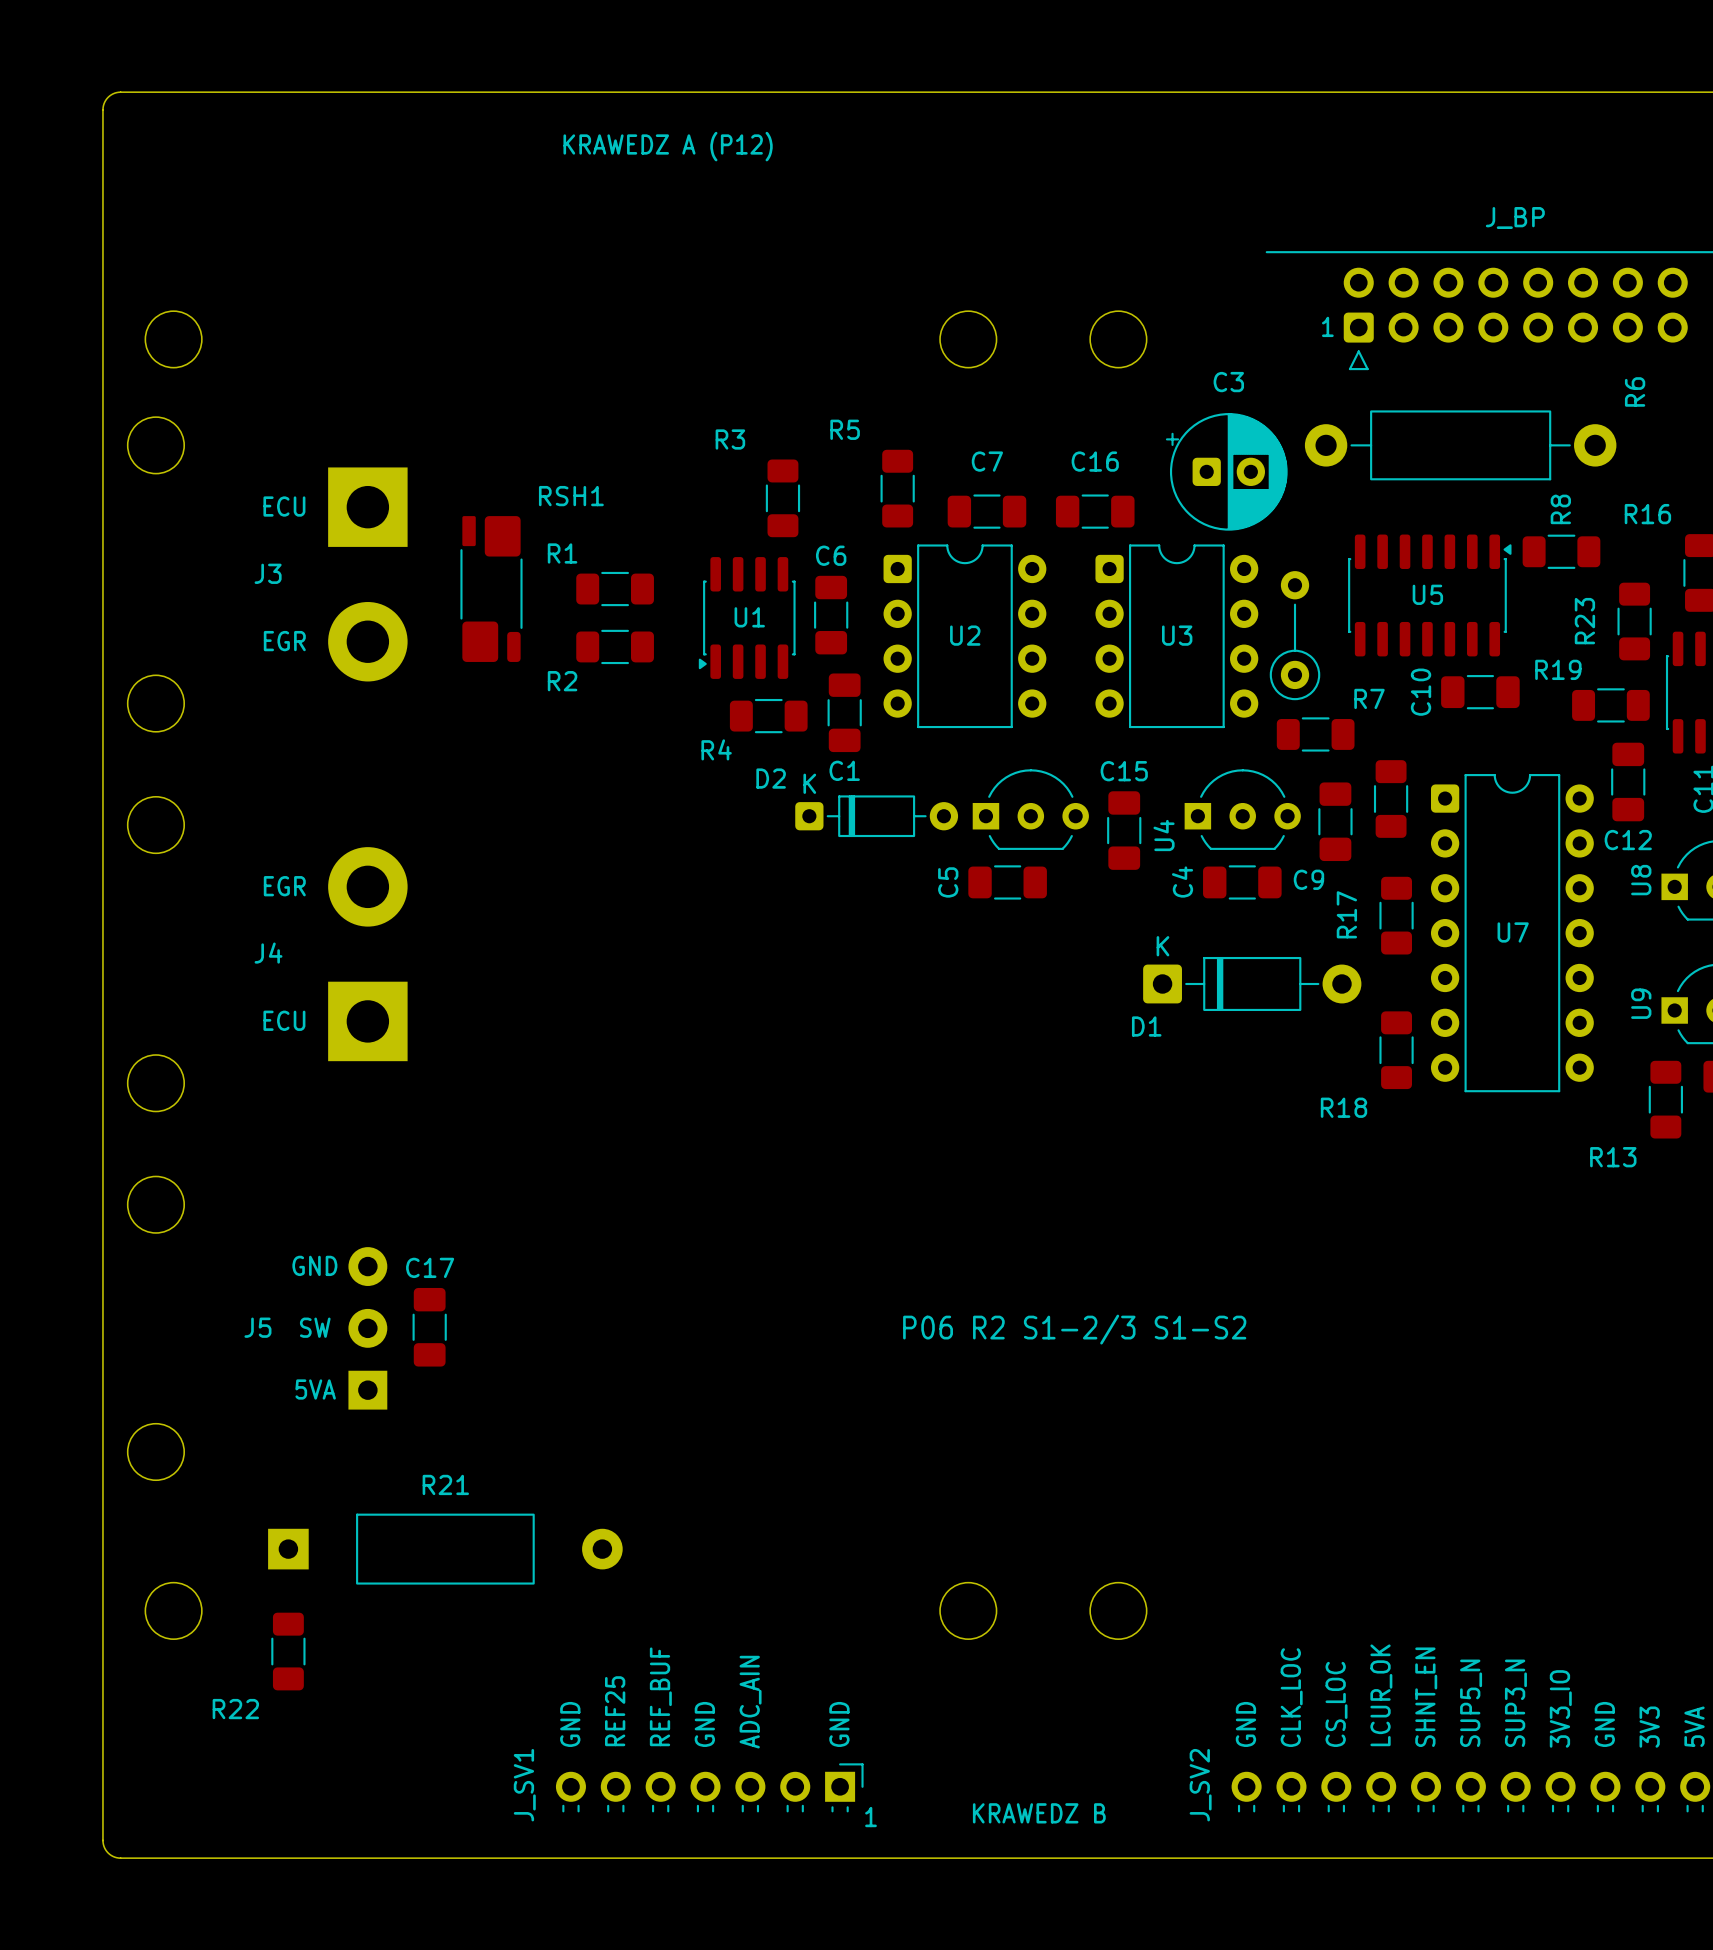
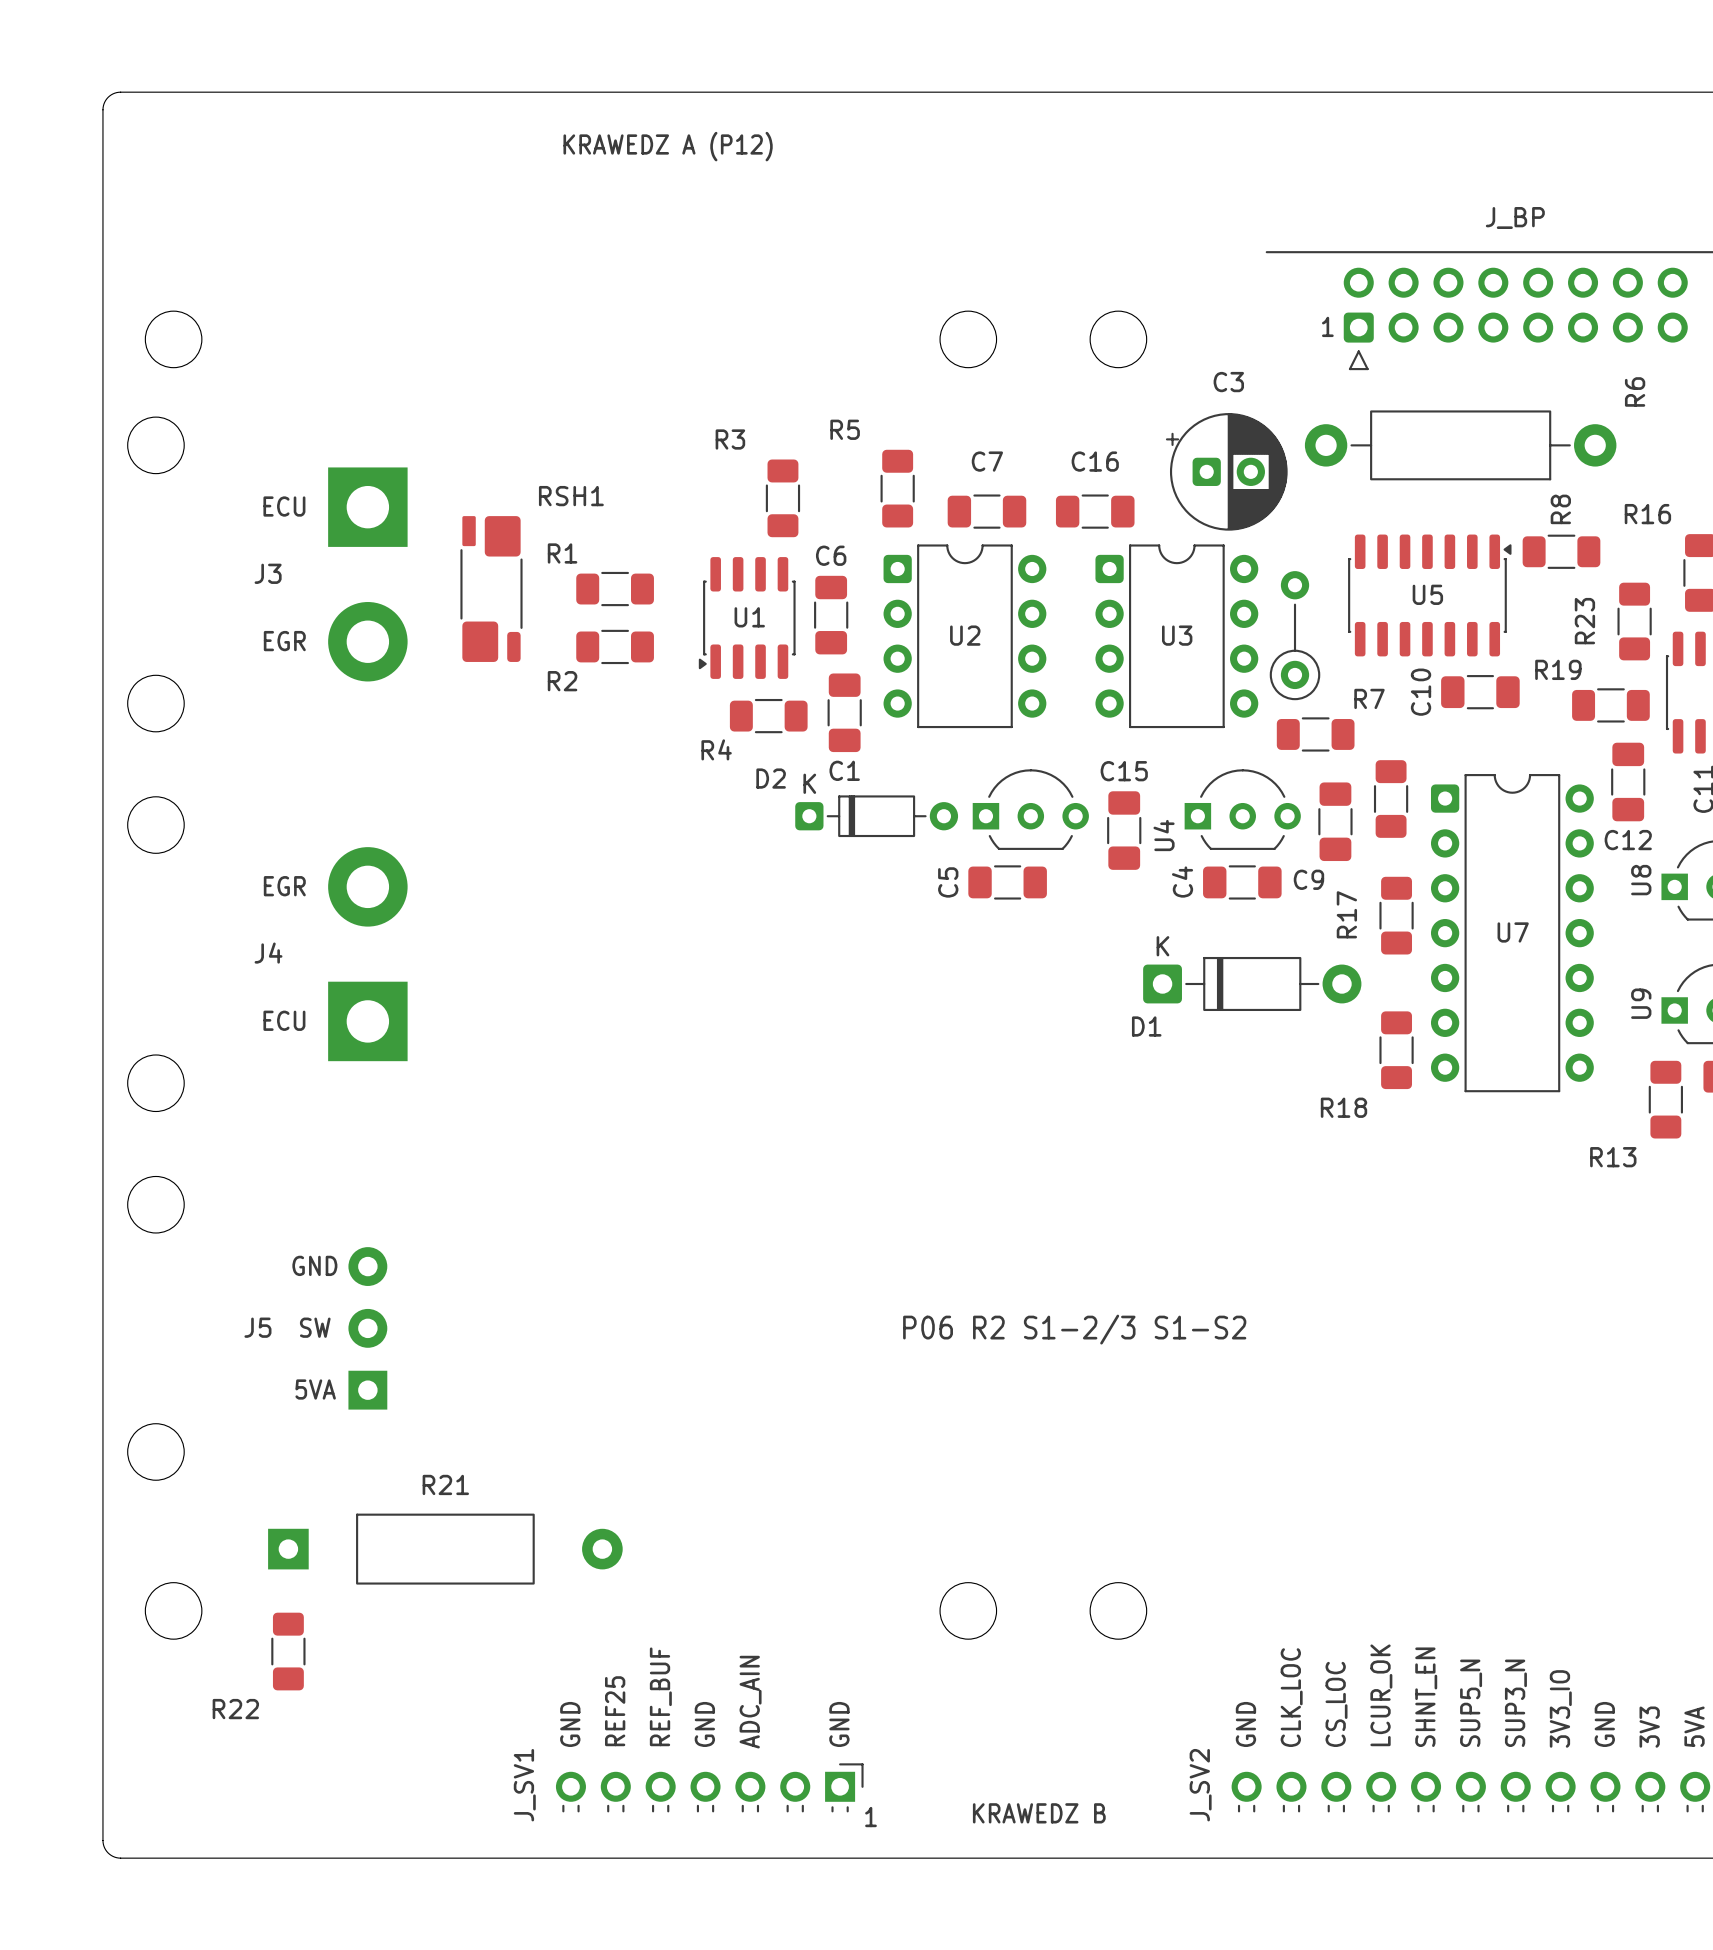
C17: (429, 1327) -> none

